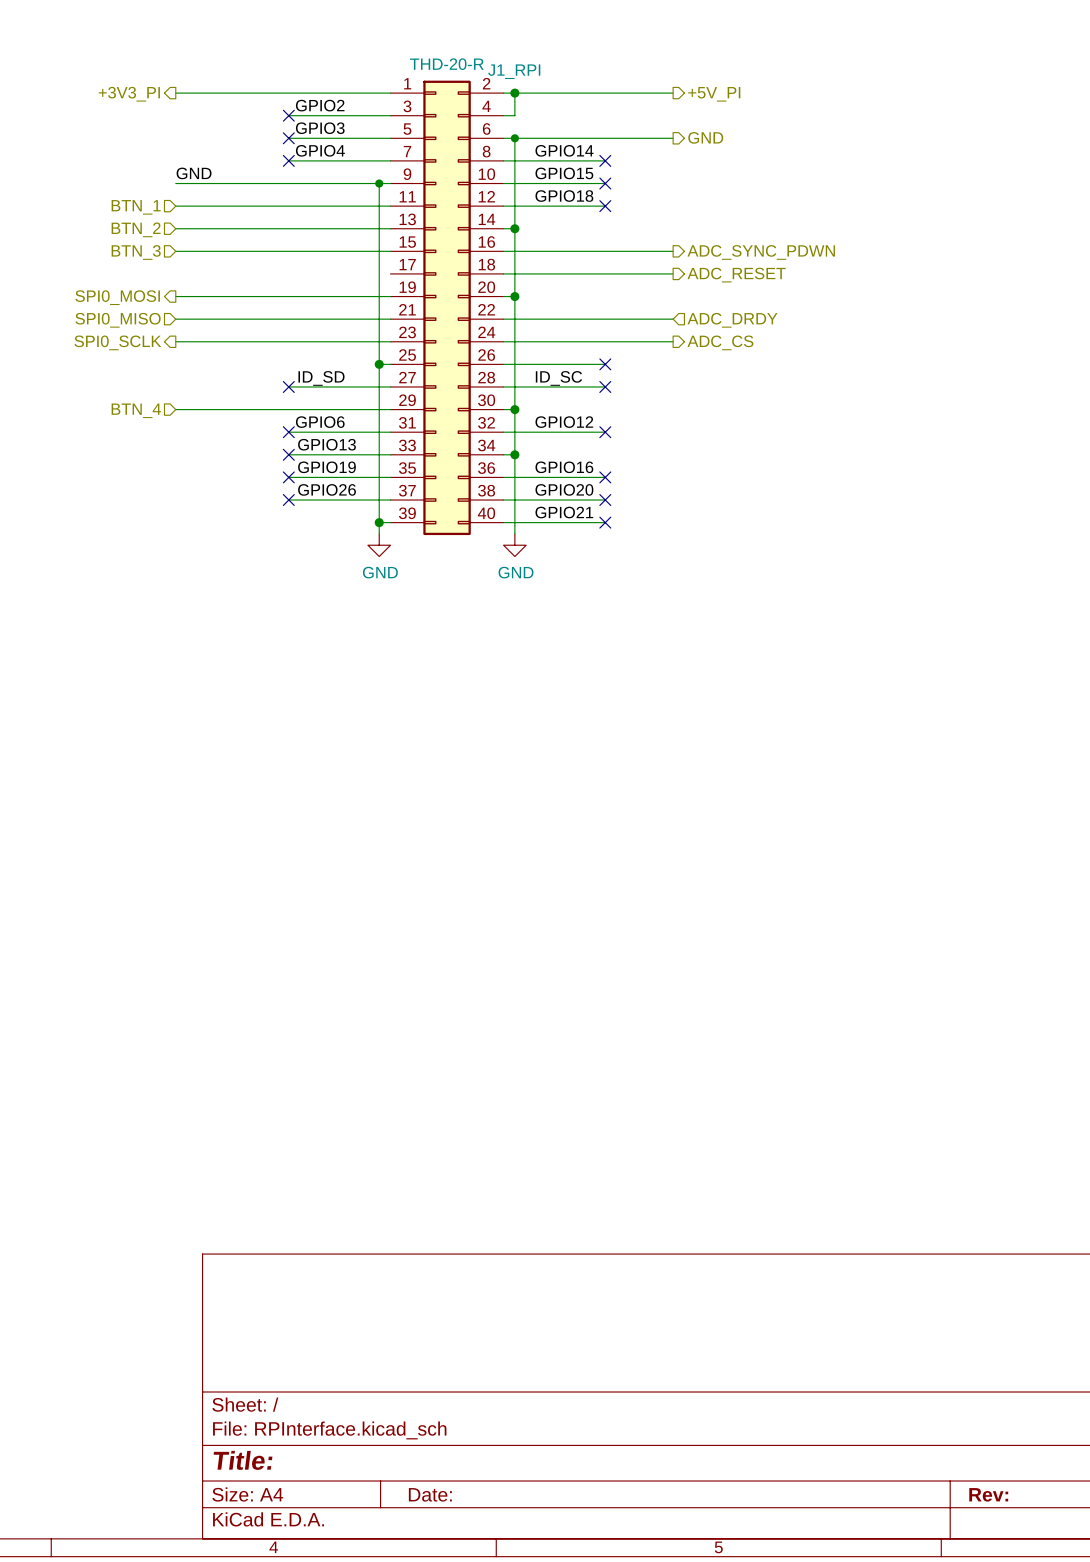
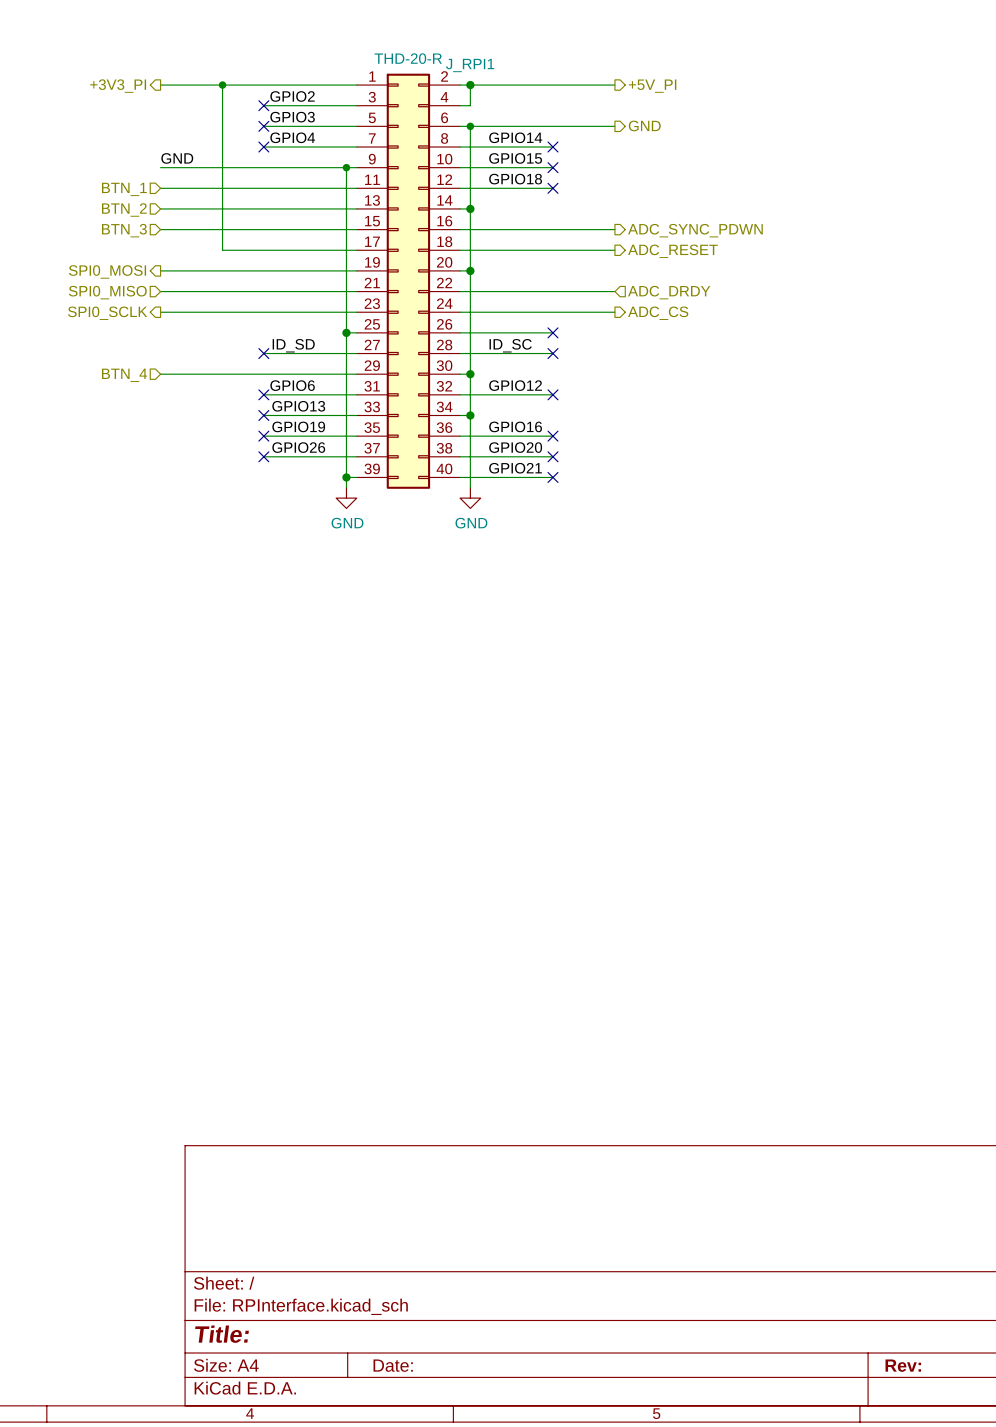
J1_RPI name: J1_RPI (514, 71) -> J_RPI1 (470, 65)
wire: none -> (222, 85) (222, 250) (356, 250)
junction: none -> (222, 85)

